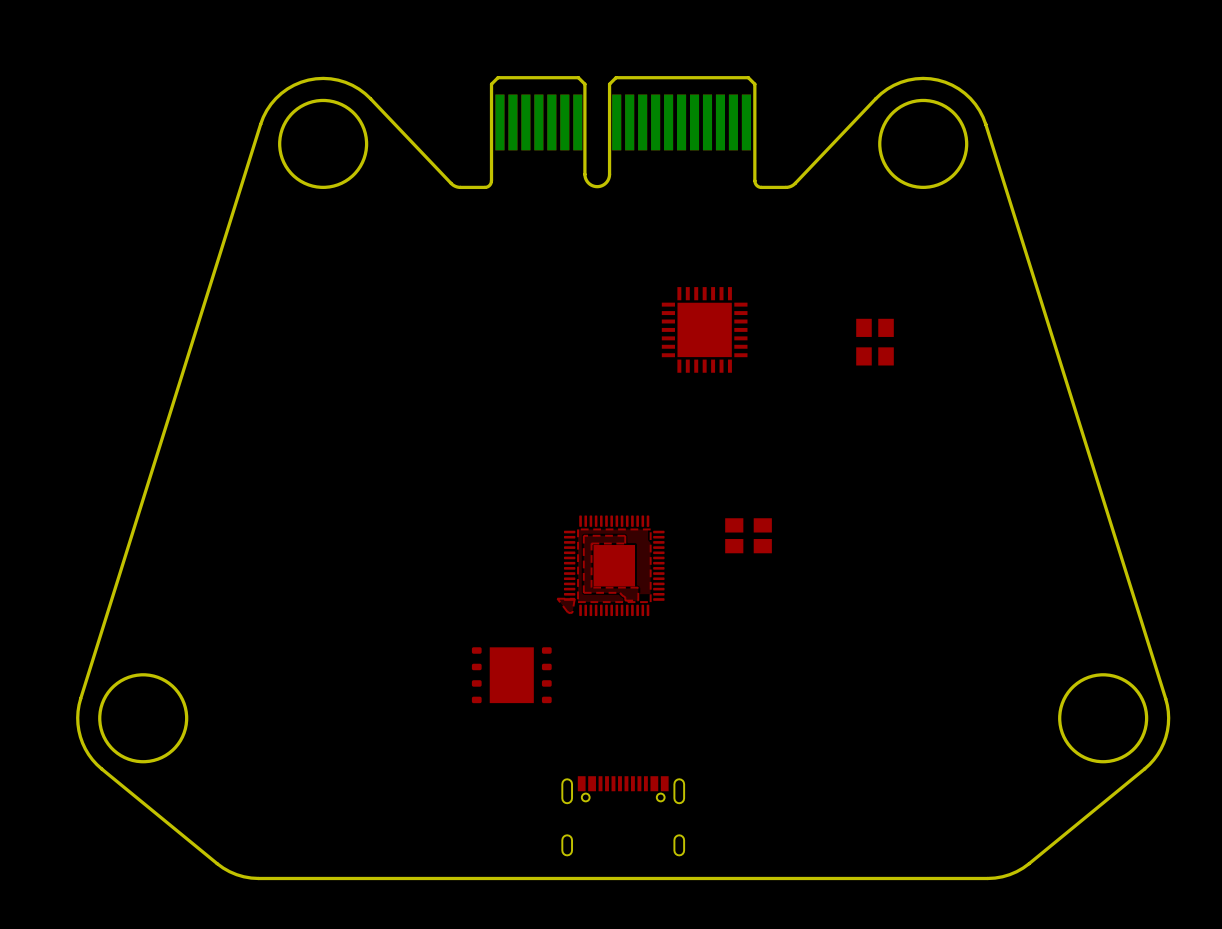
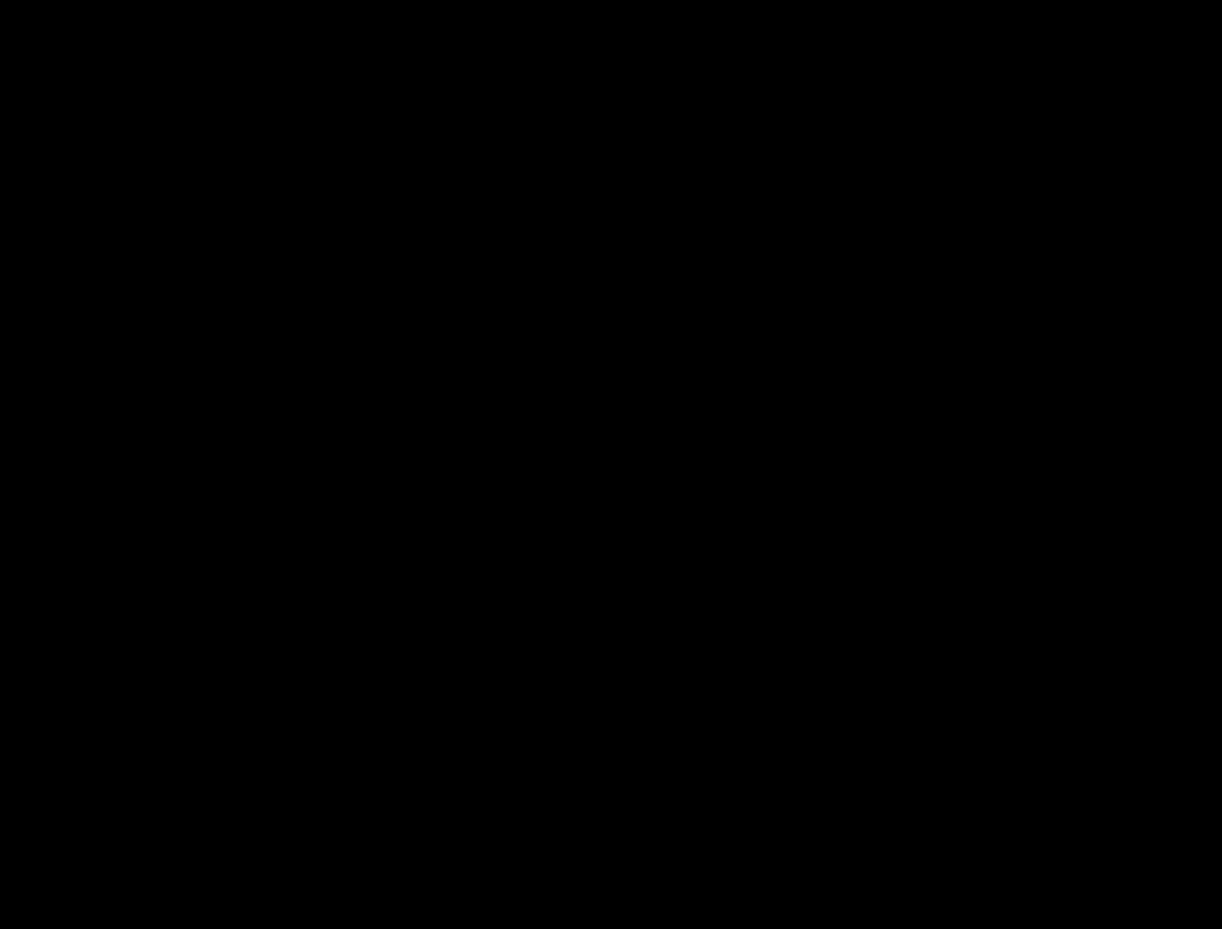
round board edge: [278, 98, 369, 189] -> none
round board edge: [878, 98, 969, 189] -> none
part: (623, 132) -> none
board edge: (754, 180) (756, 185) (760, 187) (787, 187) (793, 185) (875, 98) (887, 89) (900, 82) (915, 78) (938, 80) (958, 88) (975, 104) (985, 124) (1165, 698) (1168, 717) (1167, 730) (1163, 743) (1153, 759) (1029, 863) (1016, 871) (995, 878) (258, 878) (236, 874) (217, 863) (96, 764) (82, 743) (77, 717) (80, 698) (260, 124) (266, 110) (275, 98) (294, 85) (315, 78) (338, 80) (352, 85) (365, 93) (453, 185) (459, 187) (485, 187) (490, 184) (491, 180) -> none
part: (704, 329) -> none
part: (875, 342) -> none
top zone outline: (650, 529) (578, 529) (578, 602) (650, 602) (650, 529) -> none
top zone outline: (625, 535) (625, 543) (591, 543) (591, 587) (638, 587) (638, 600) (625, 600) (625, 597) (620, 592) (583, 592) (583, 535) (625, 535) -> none
part: (748, 535) -> none
part: (614, 565) -> none
top zone outline: (557, 598) (567, 612) (572, 612) (574, 598) (557, 598) -> none
round board edge: [98, 673, 189, 764] -> none
round board edge: [1058, 673, 1149, 764] -> none
part: (511, 675) -> none
part: (623, 816) -> none

